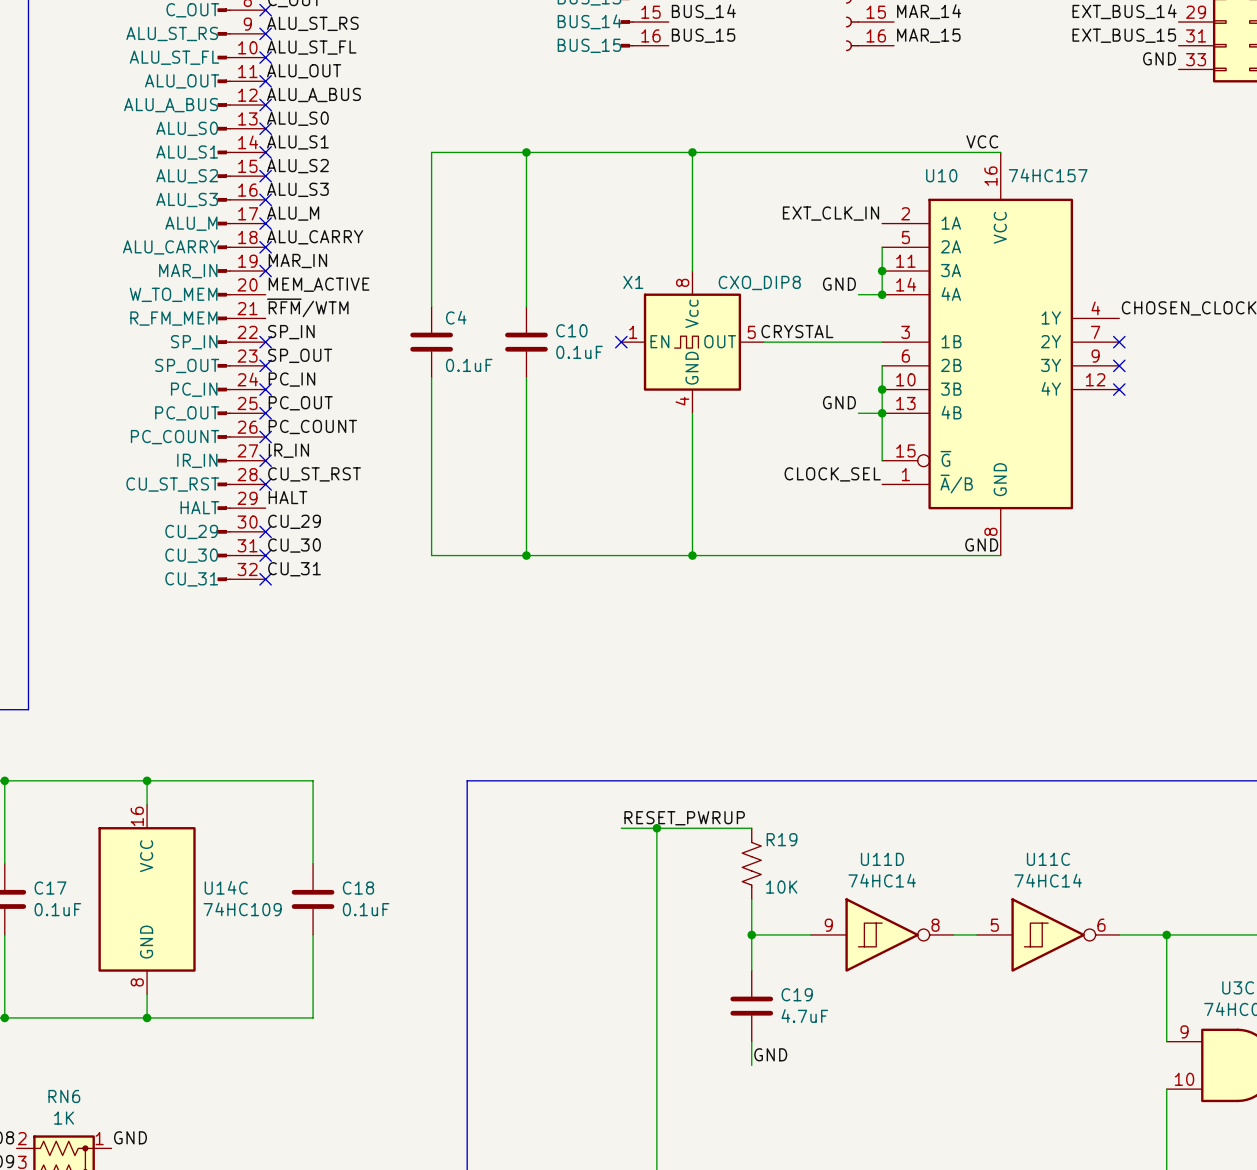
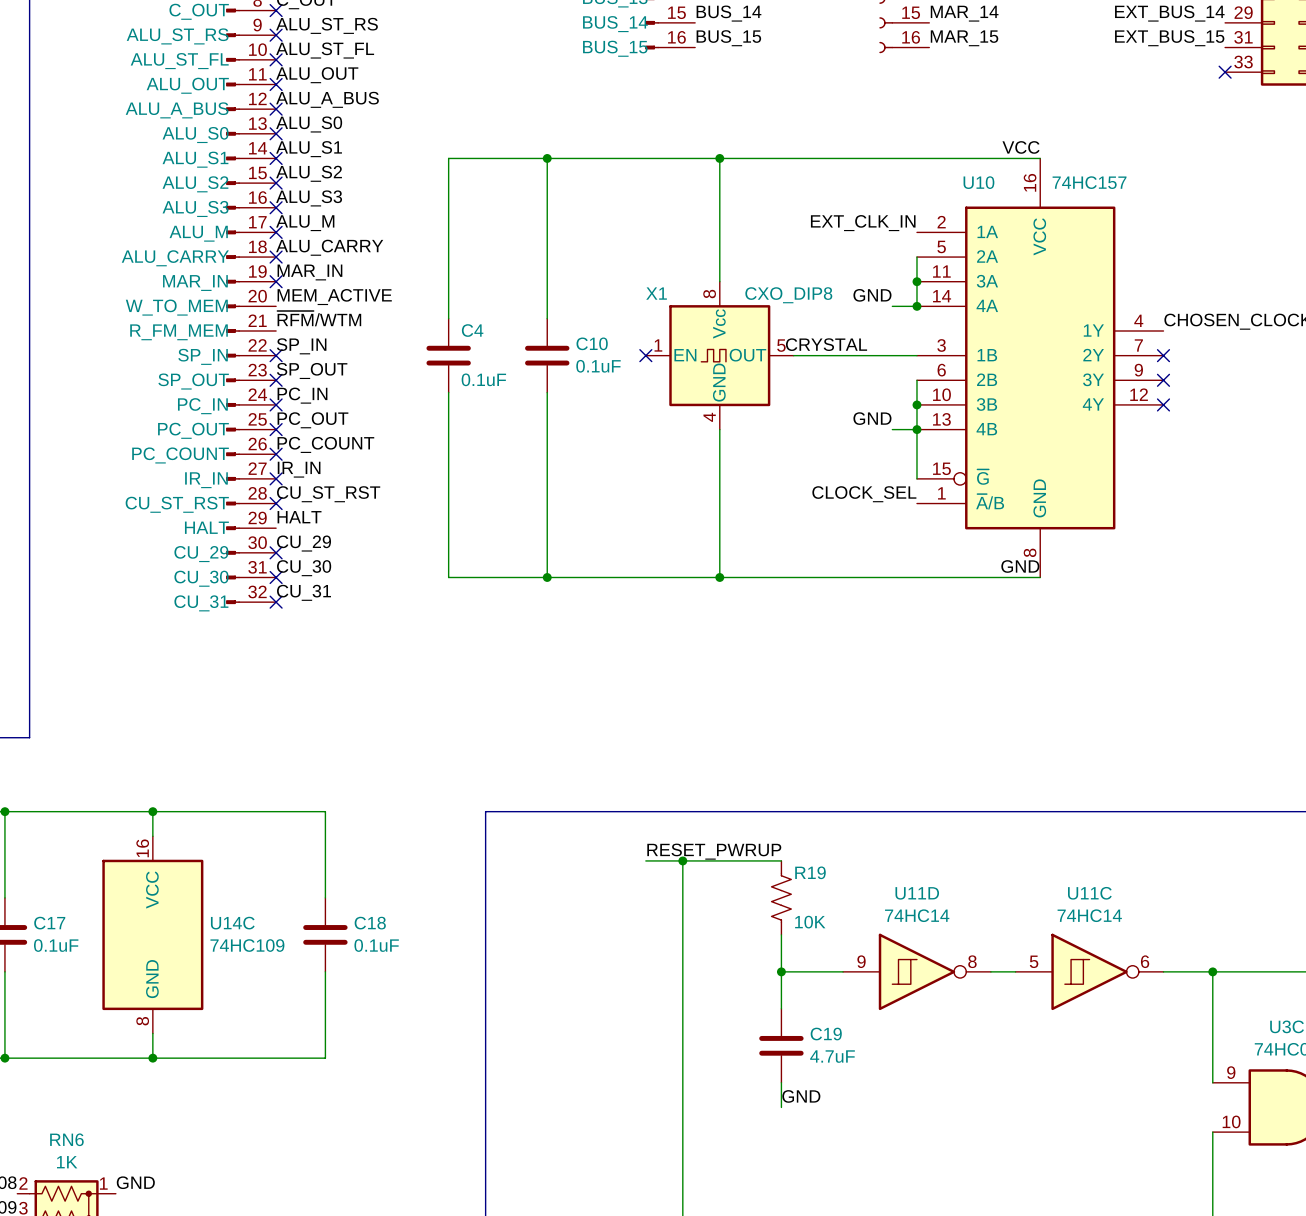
label: GND (1159, 58) -> none
no-connect mark: none -> (1225, 72)

